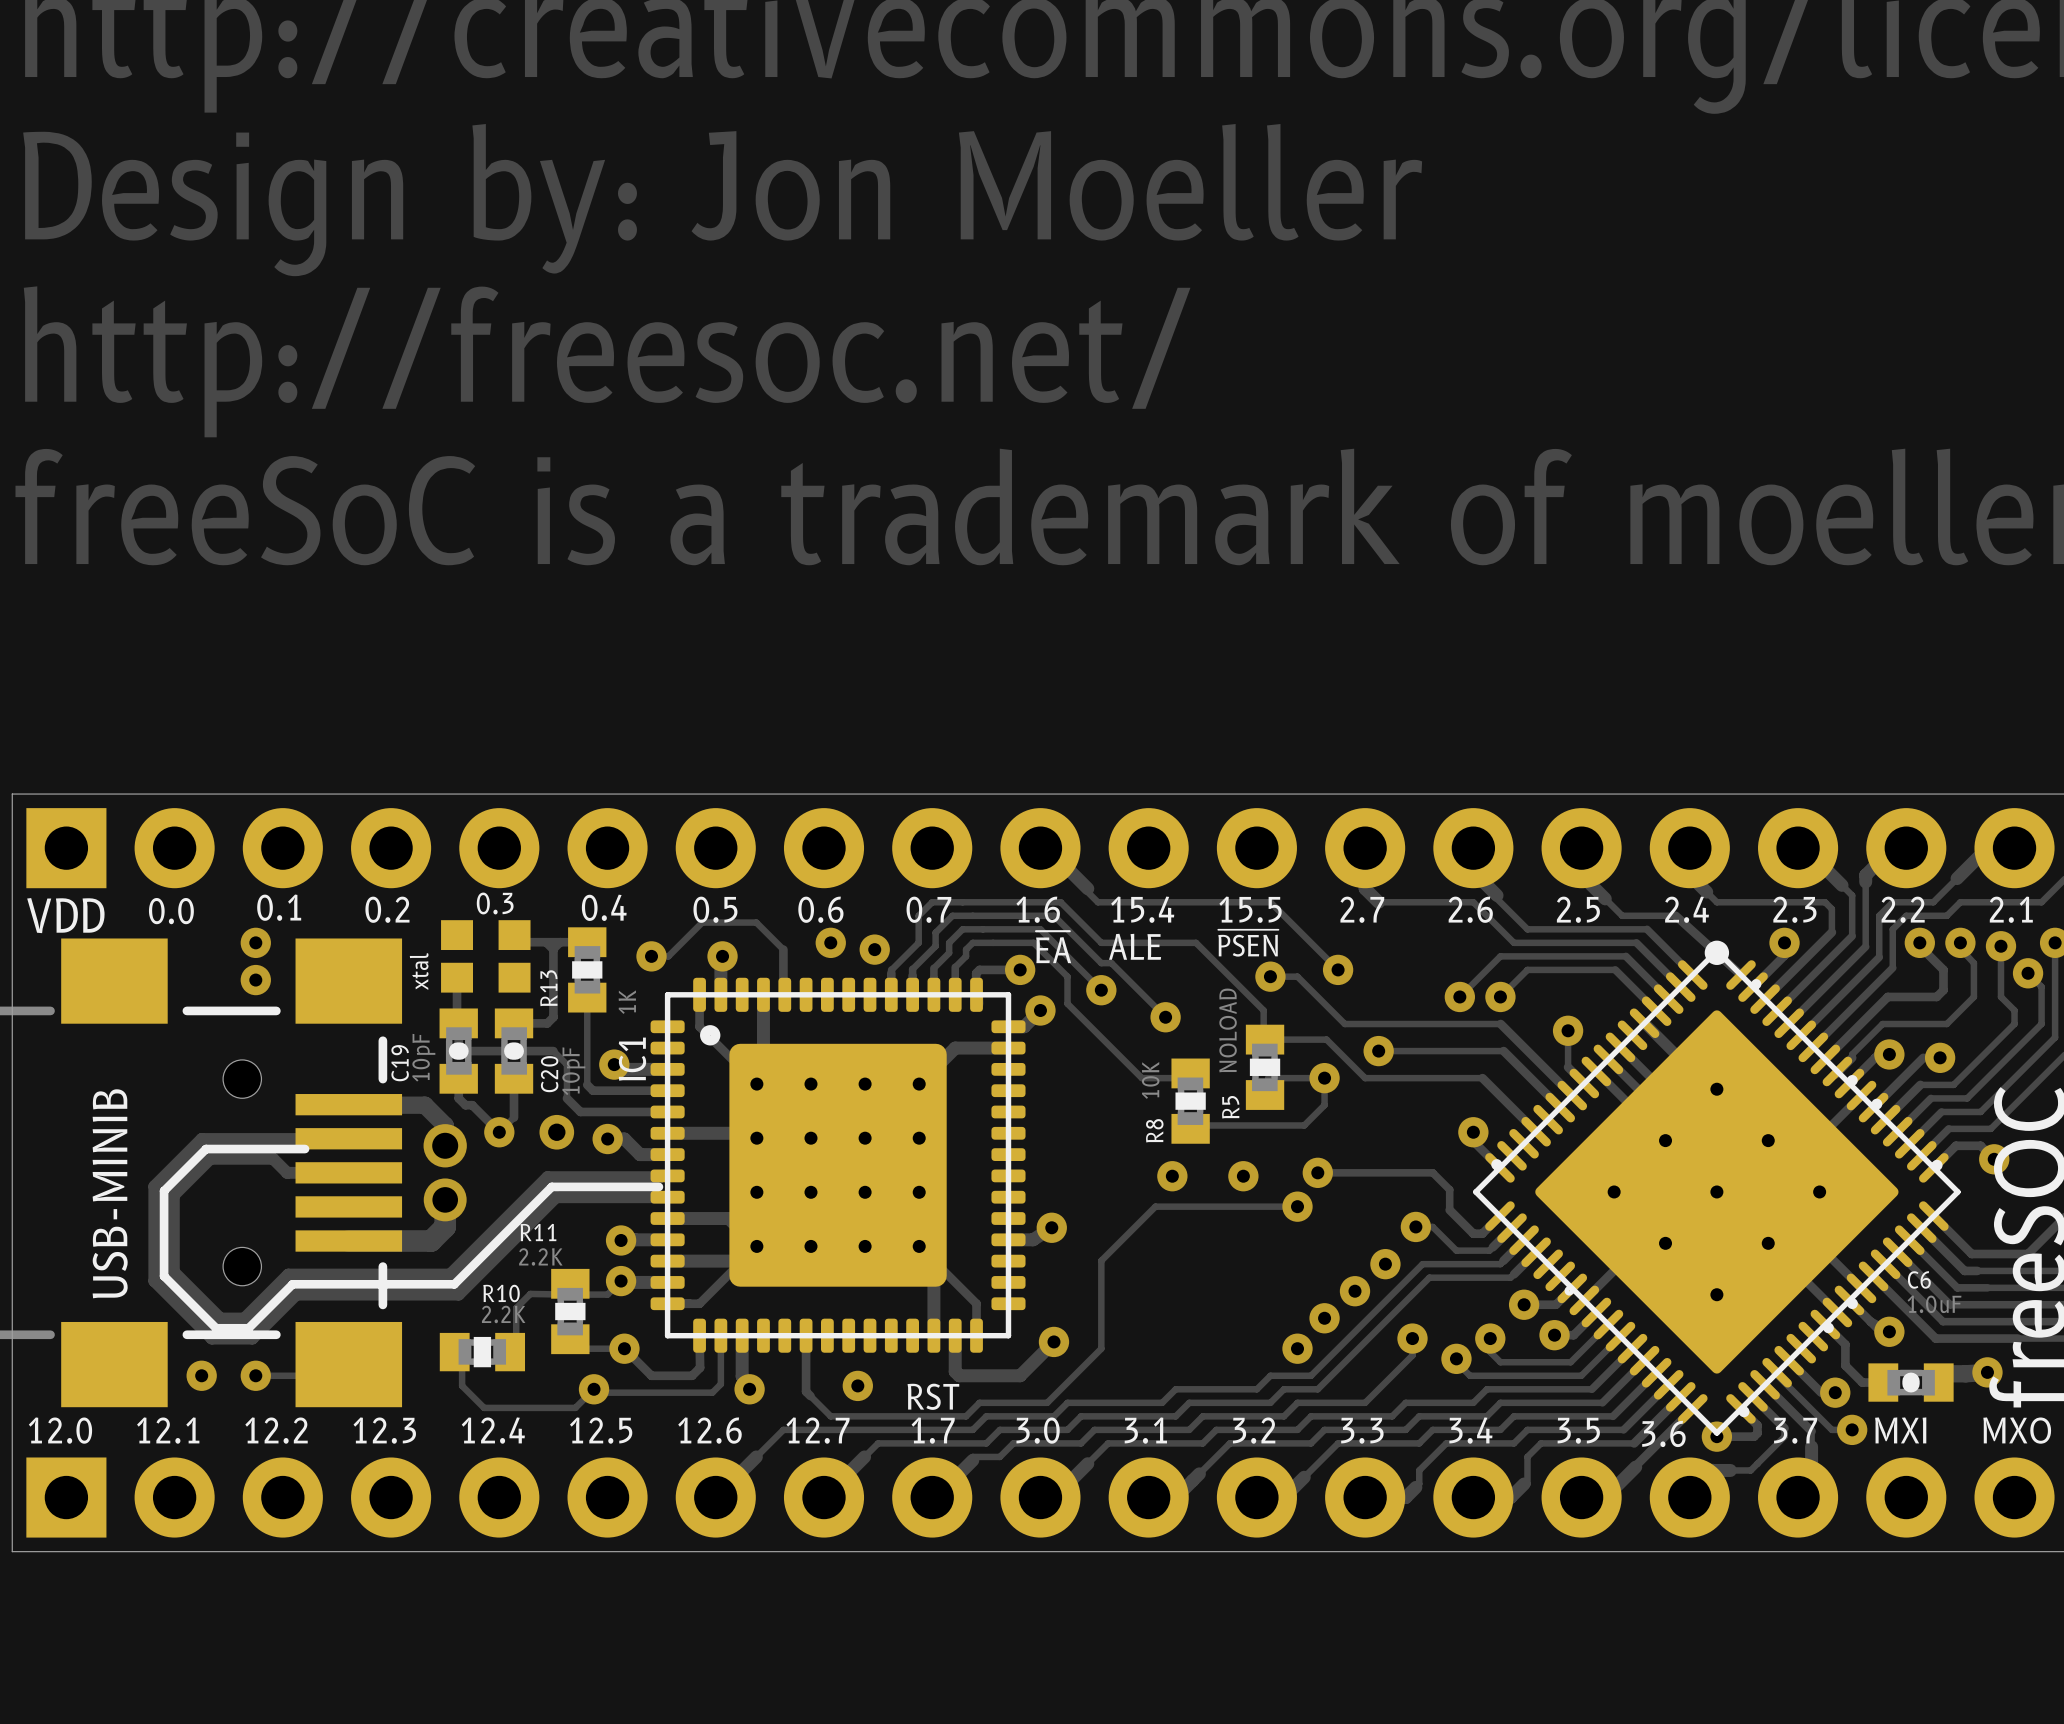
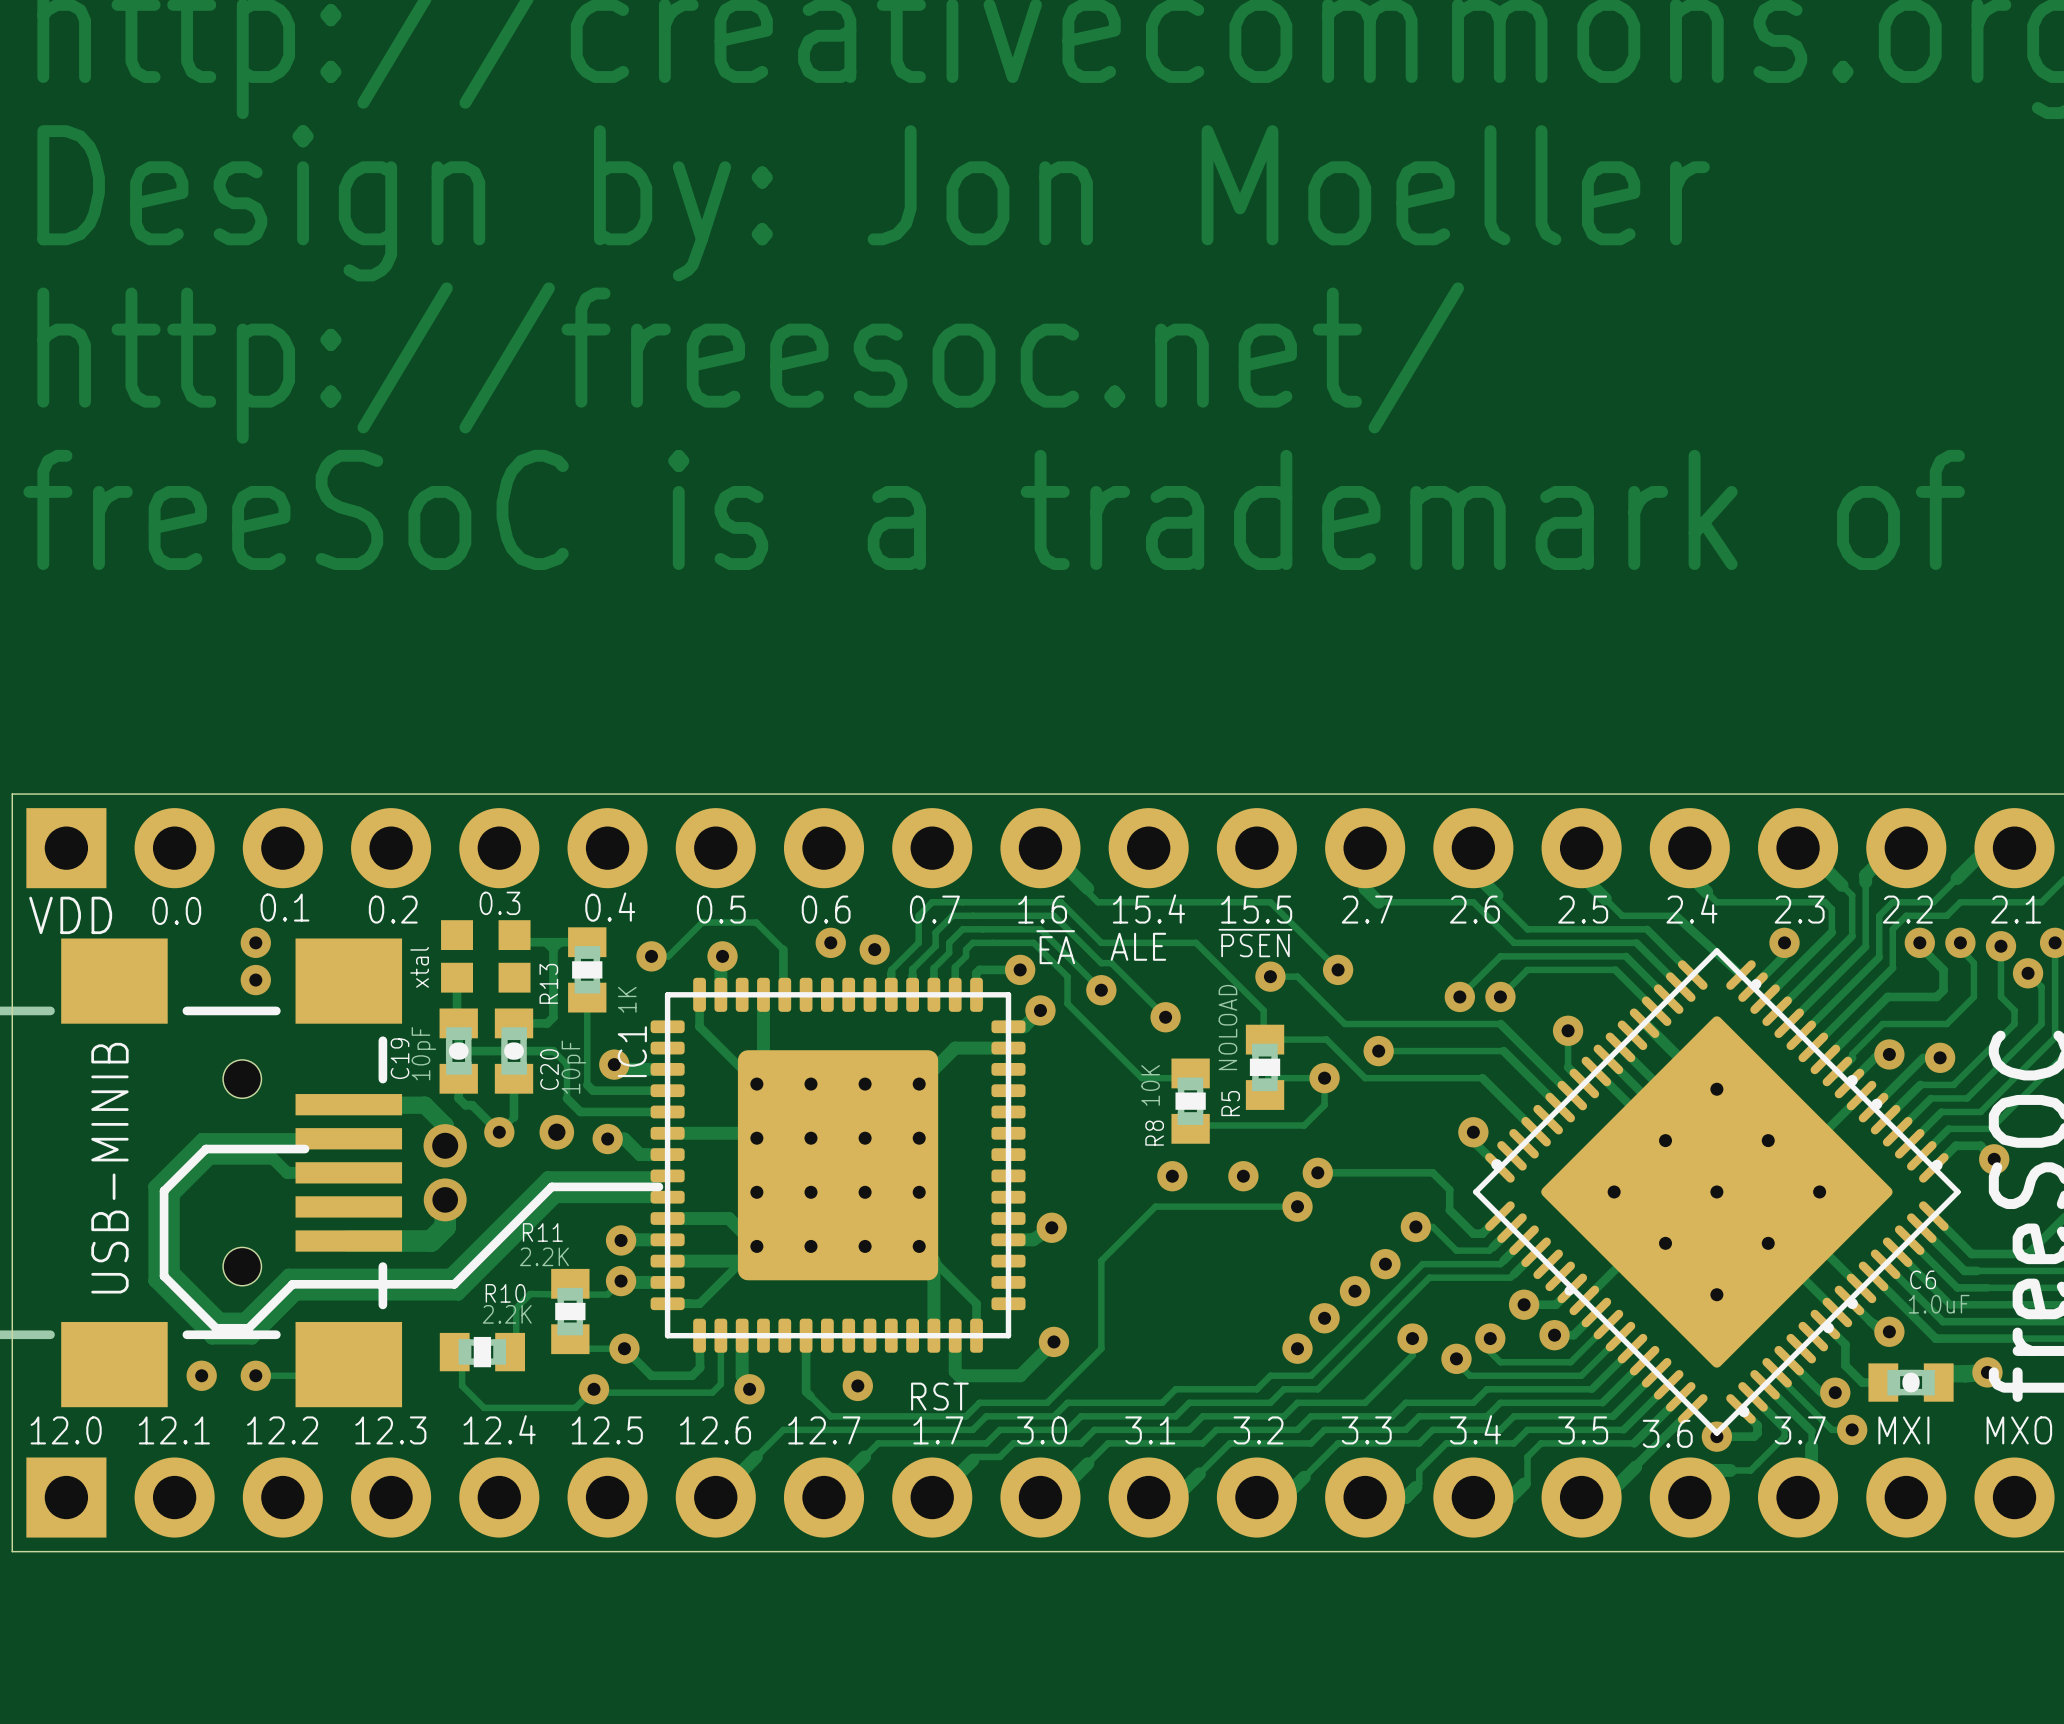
part footprint: [1473, 940, 1961, 1436] -> [1473, 948, 1961, 1436]
IC1 footprint: [650, 977, 1026, 1353] -> [650, 977, 1026, 1353]

